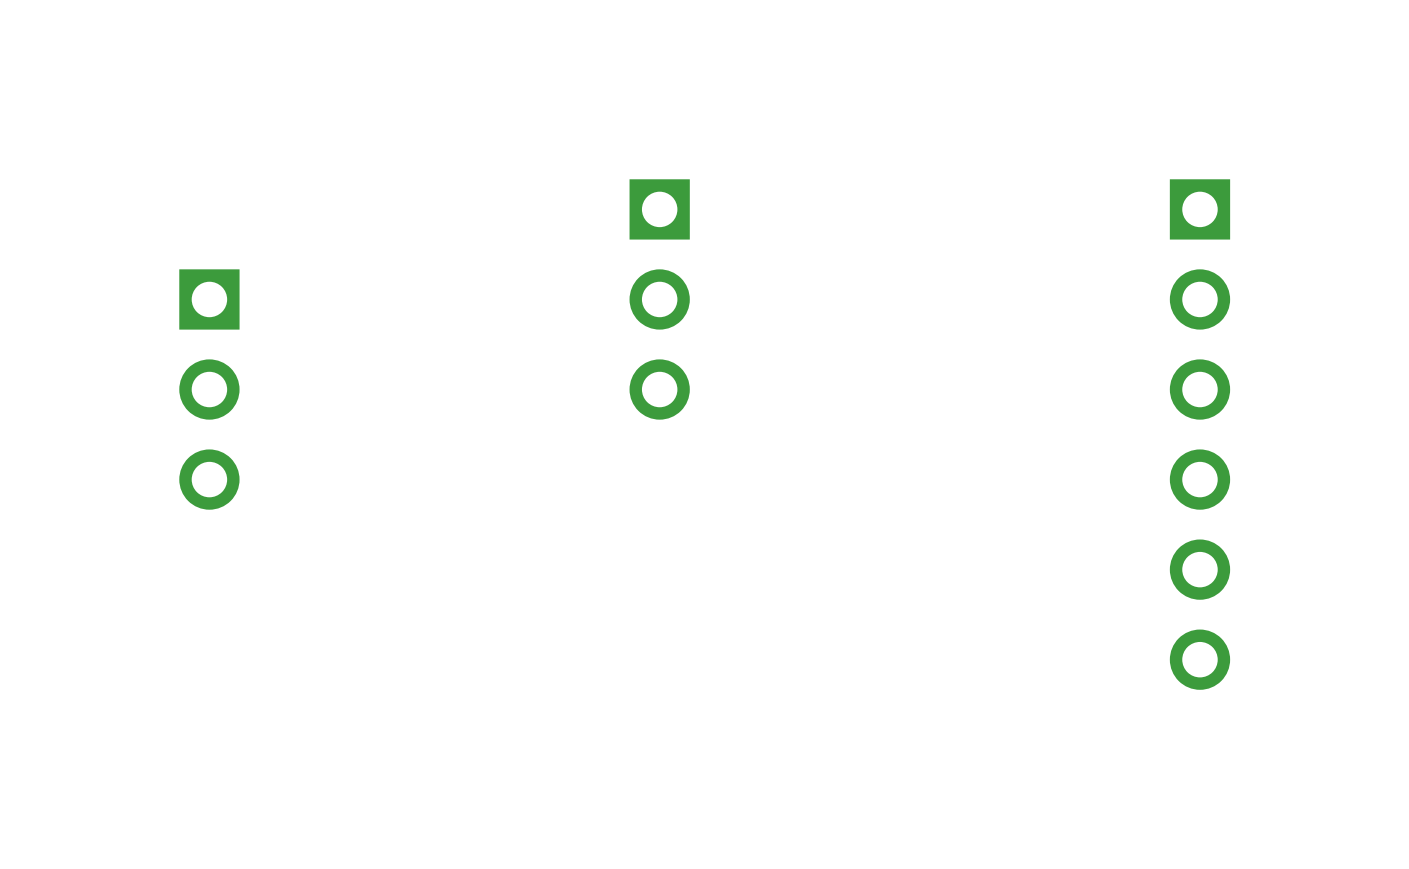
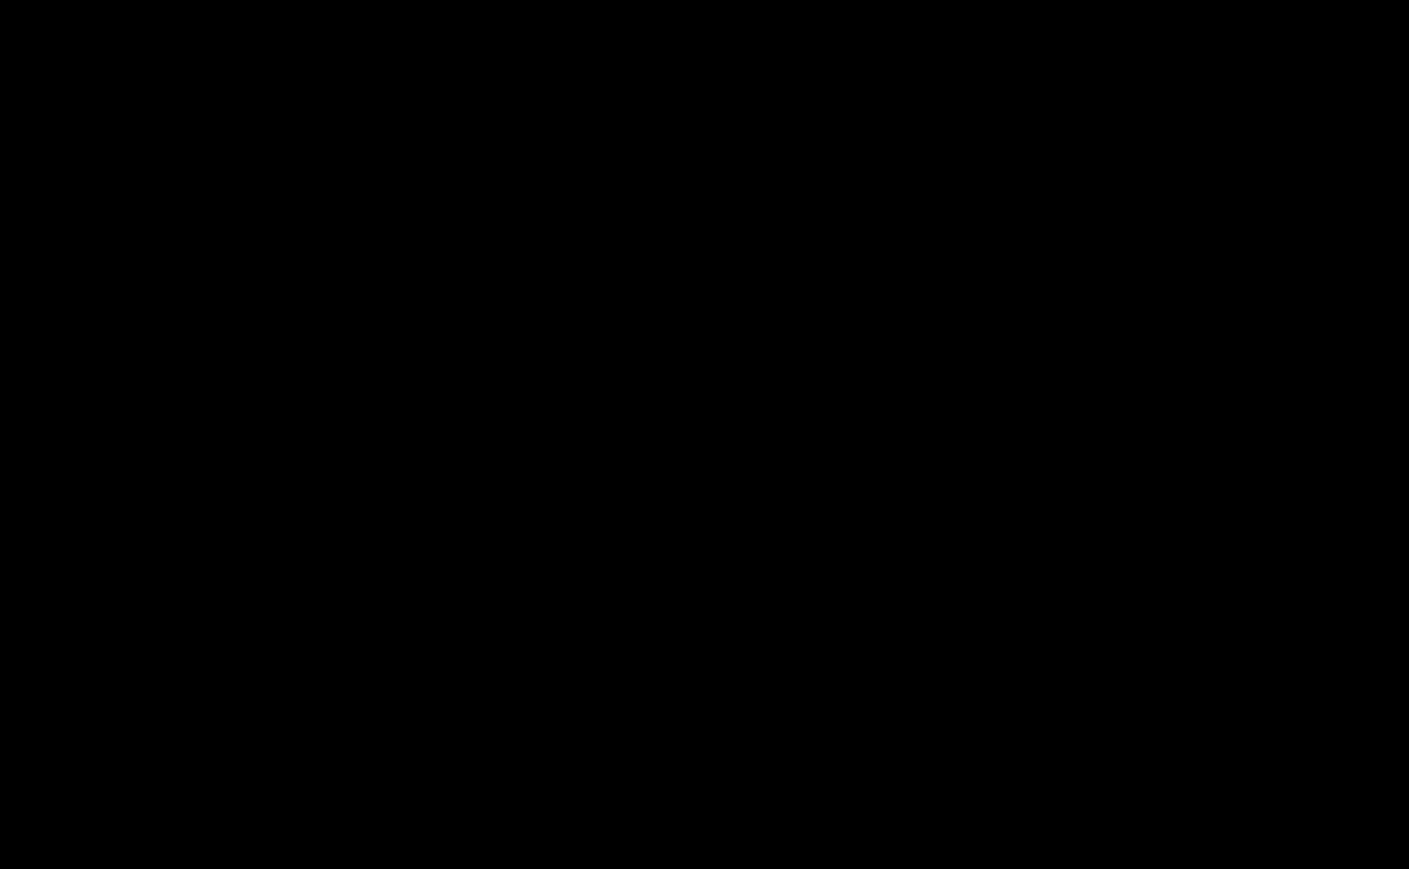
part: (659, 299) -> none
part: (209, 389) -> none
part: (1199, 434) -> none

